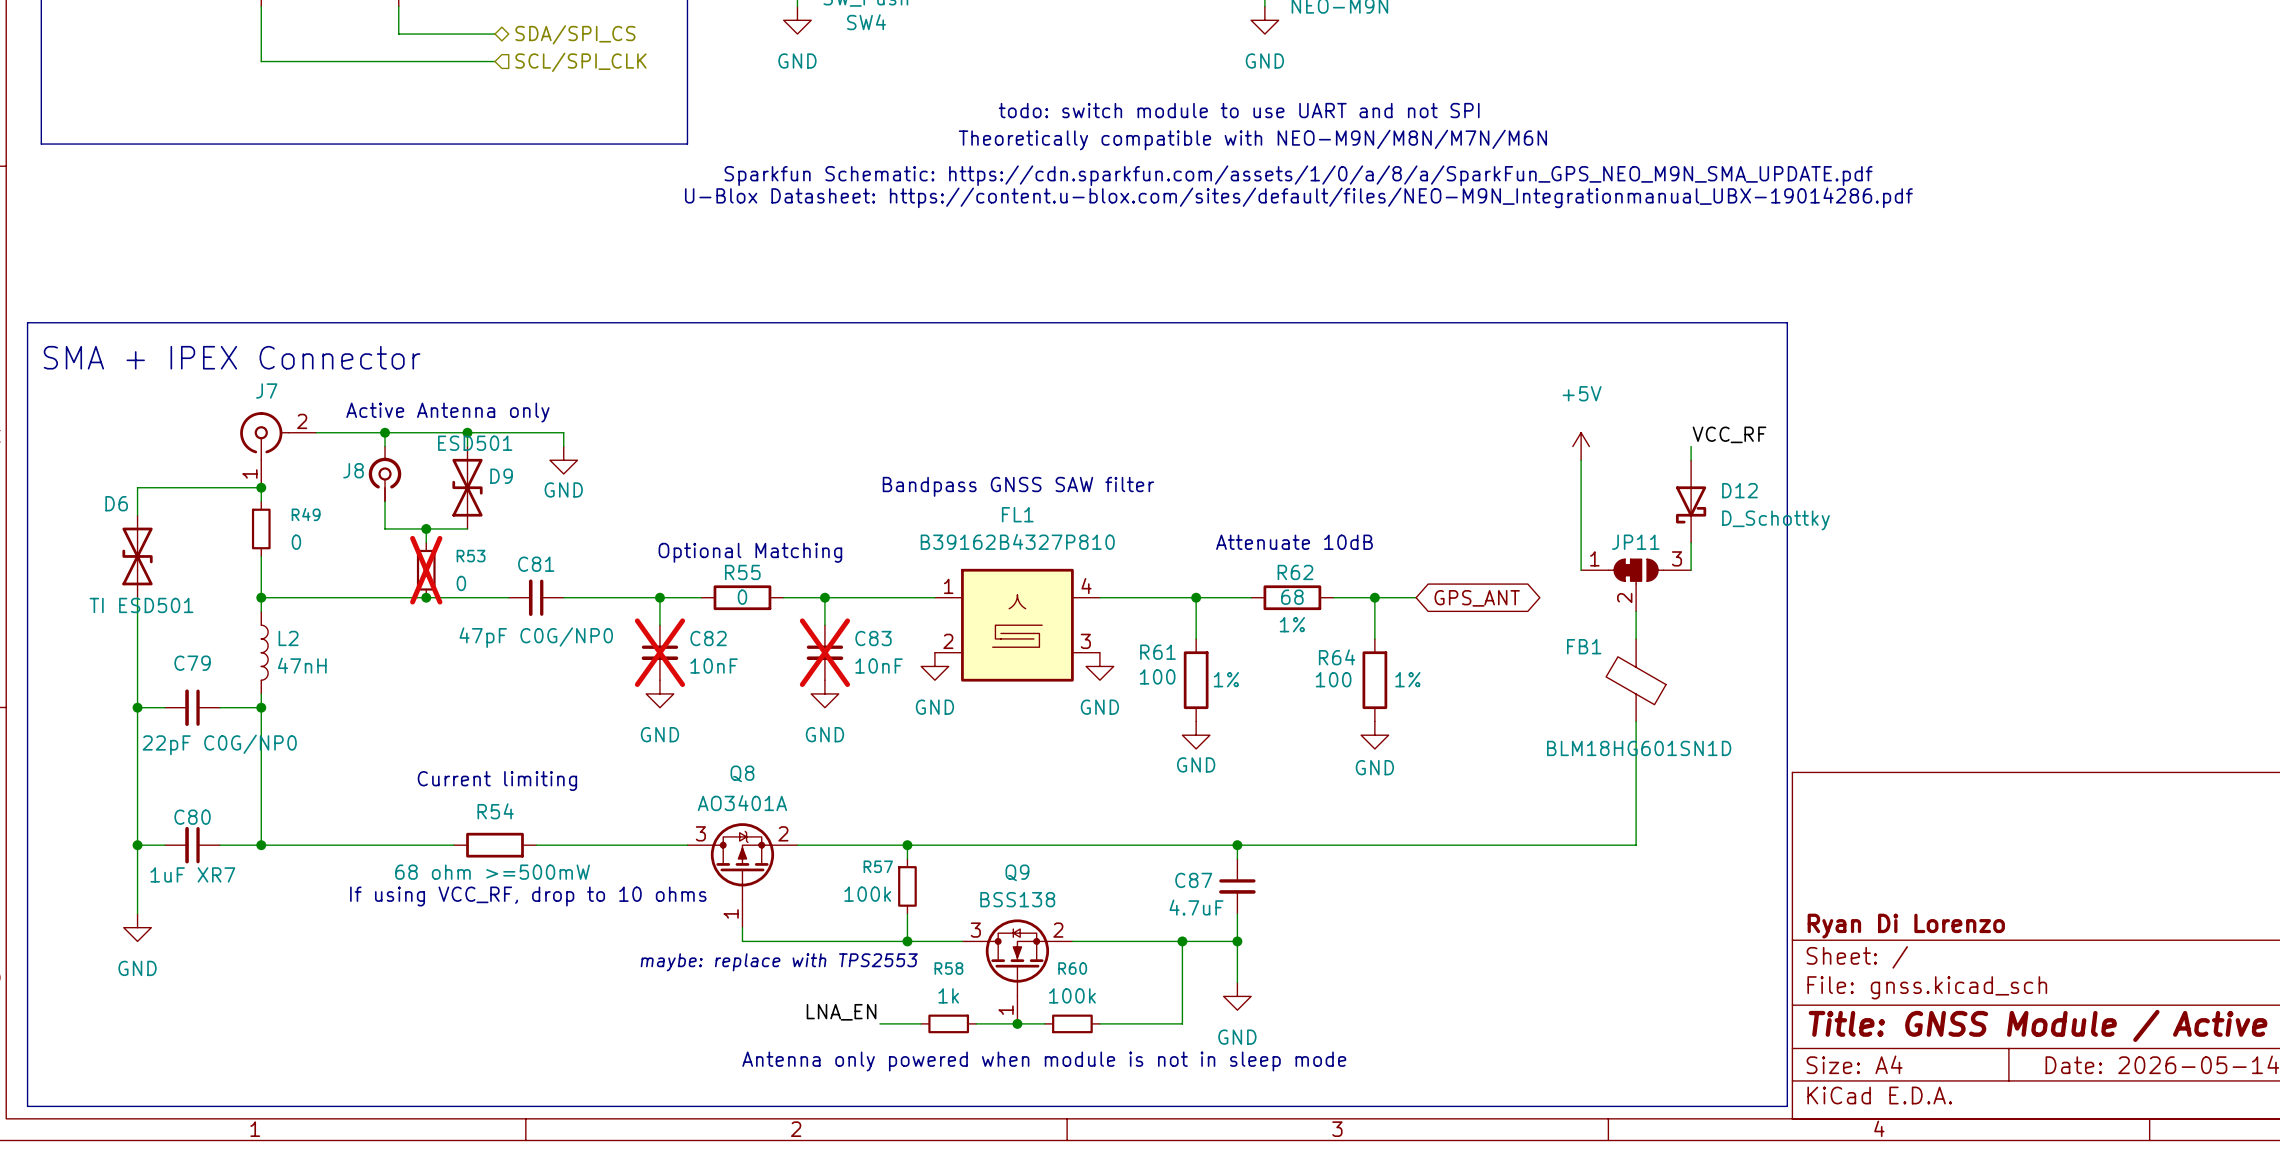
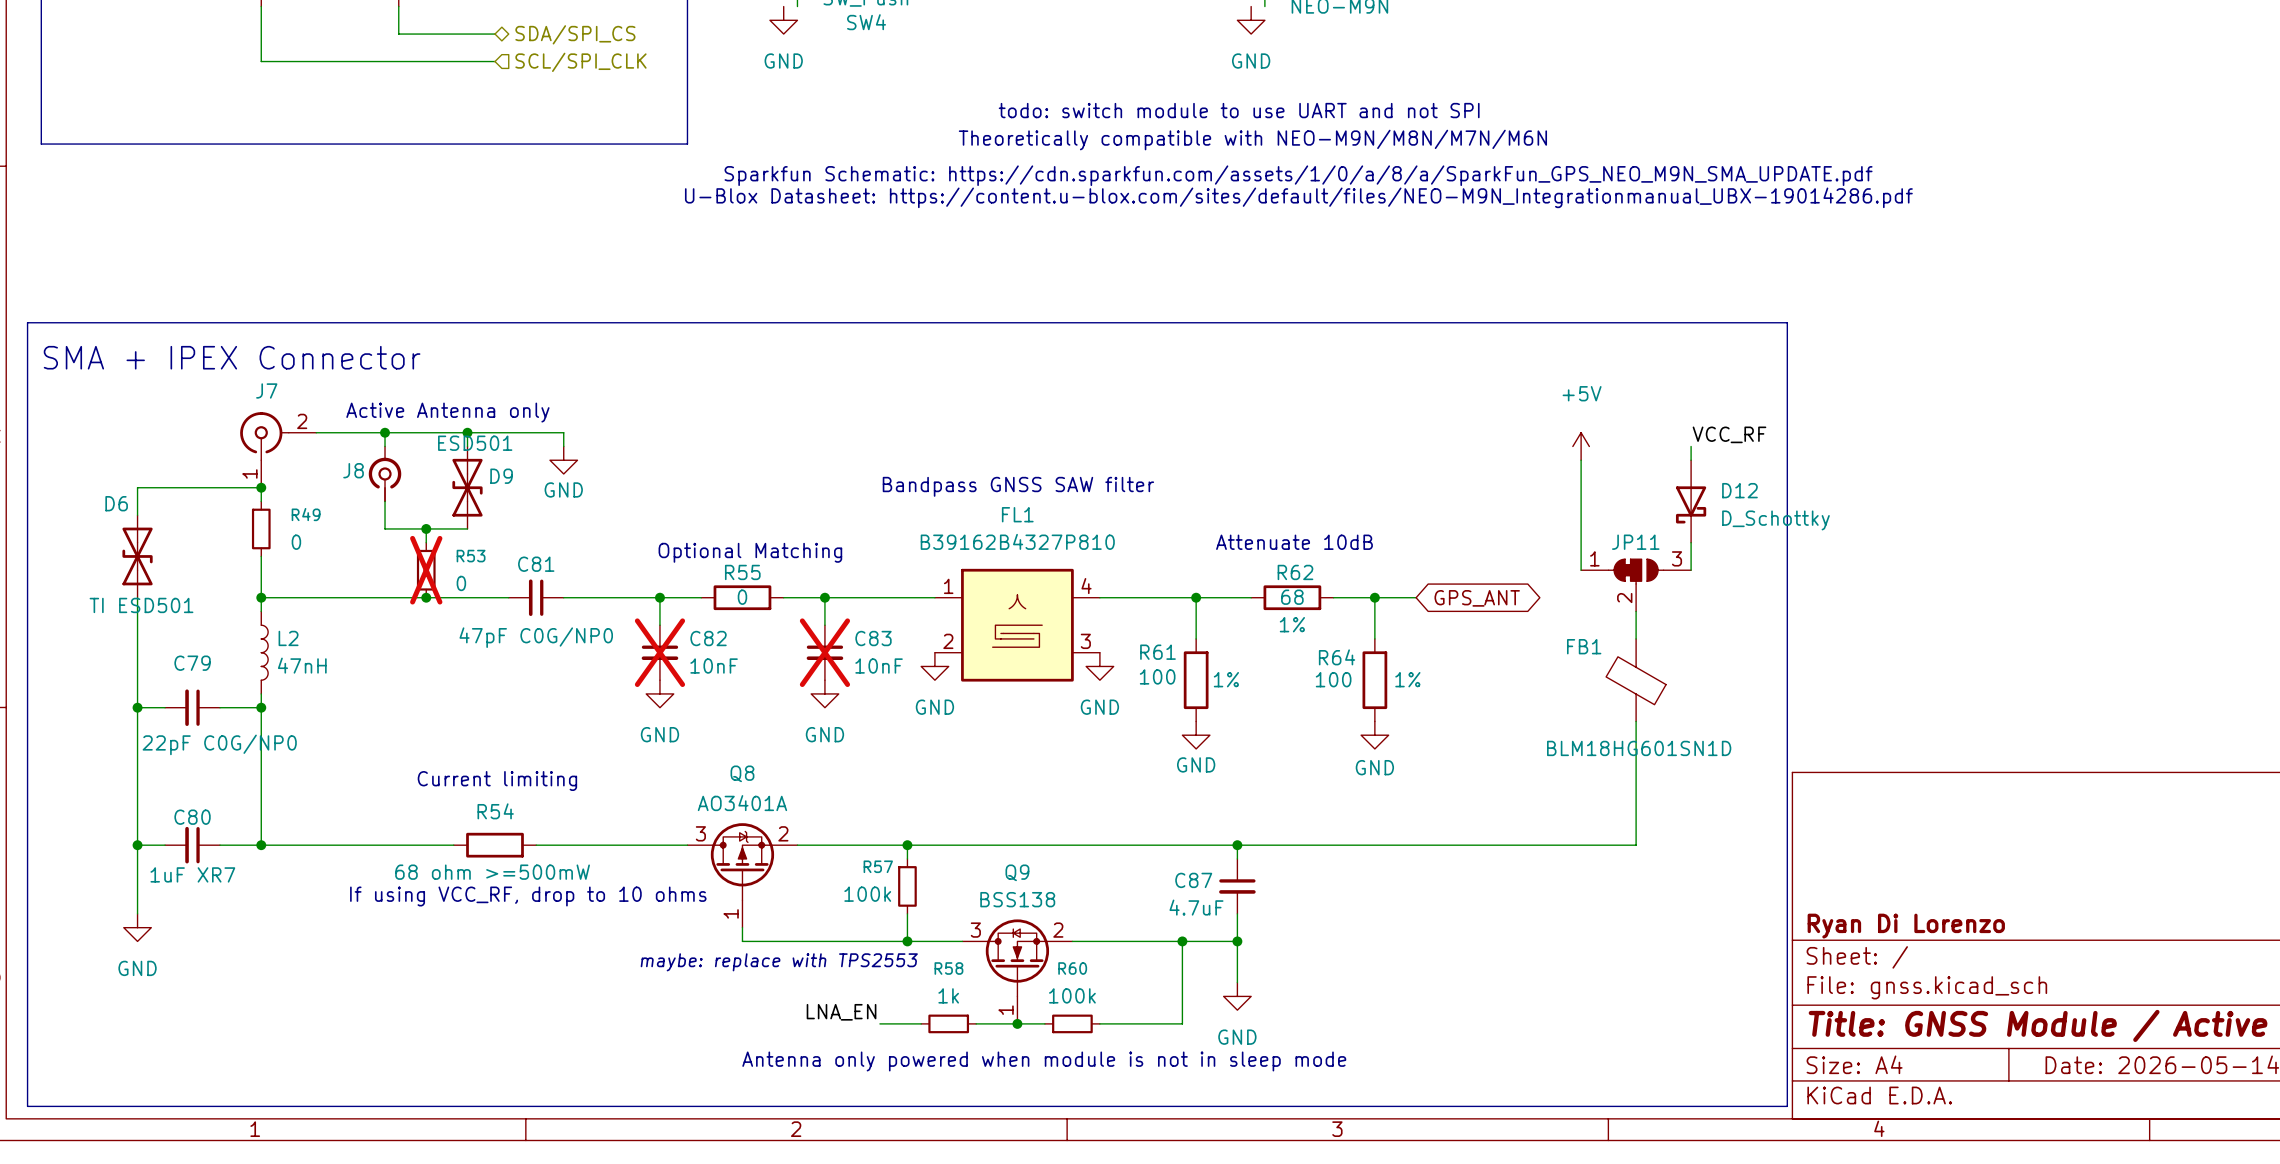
power symbol position: GND (797, 20) -> GND (783, 20)
power symbol position: GND (1264, 20) -> GND (1251, 20)

